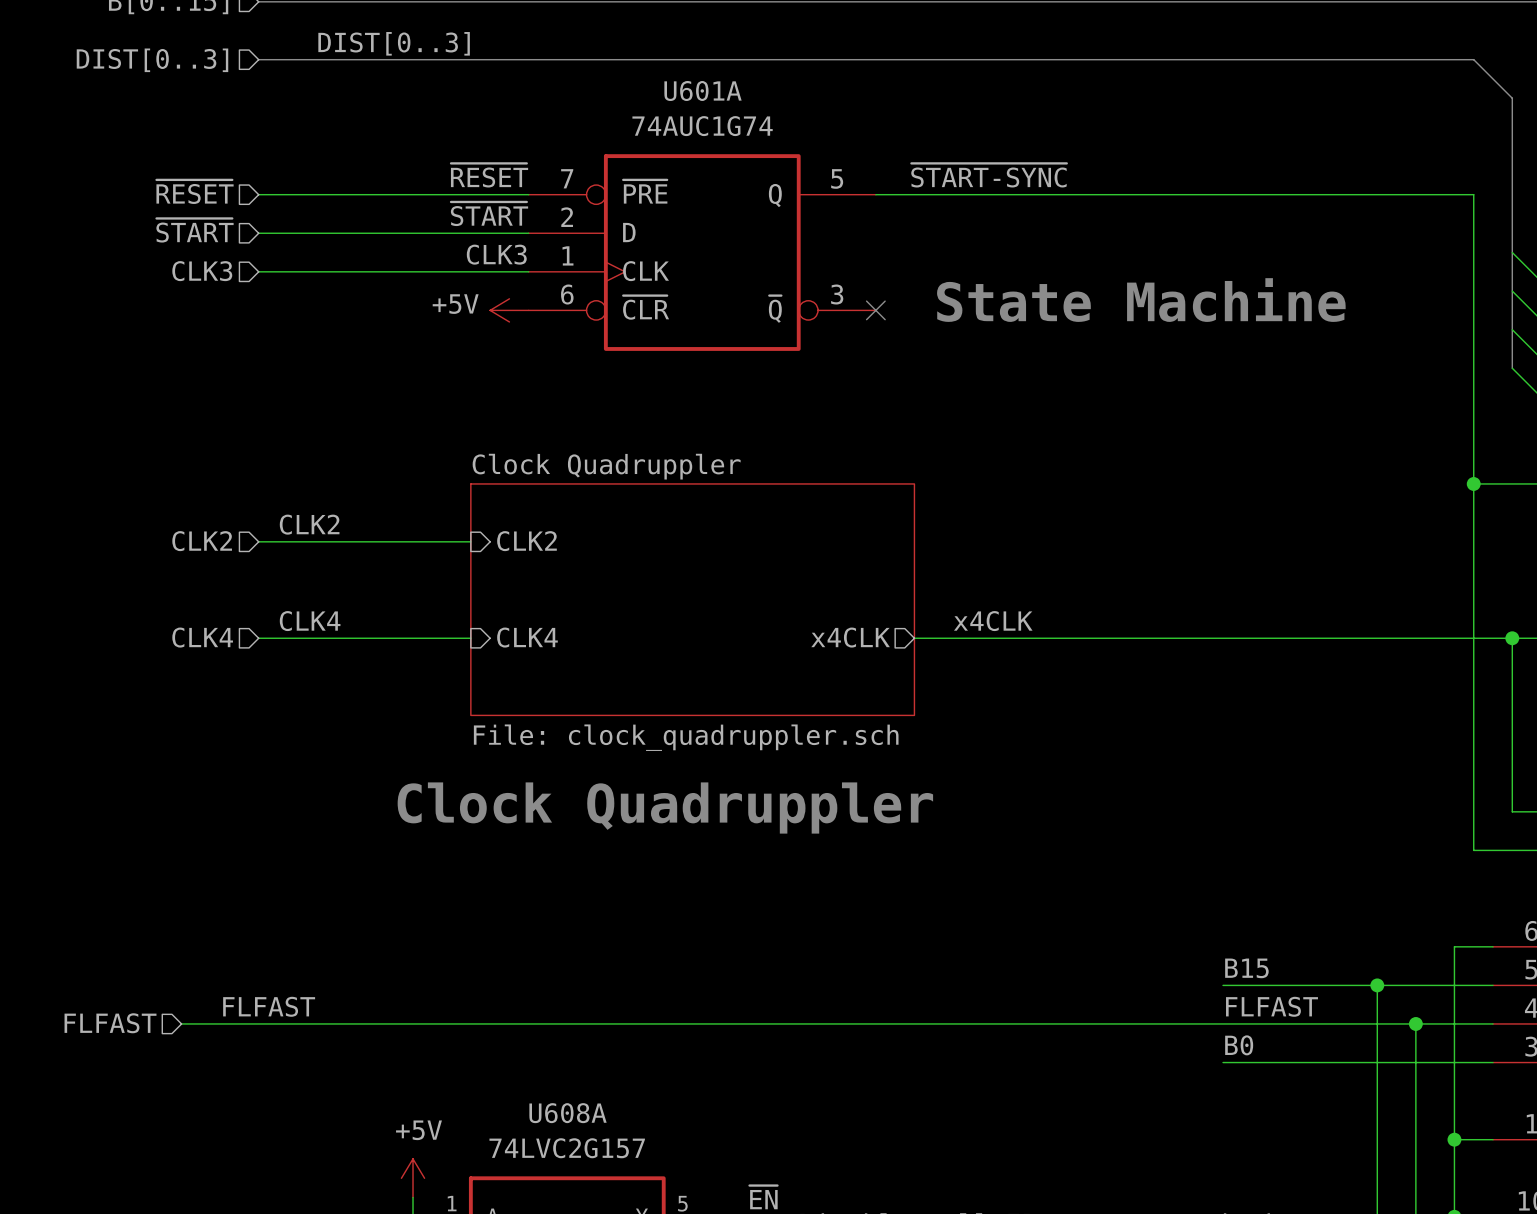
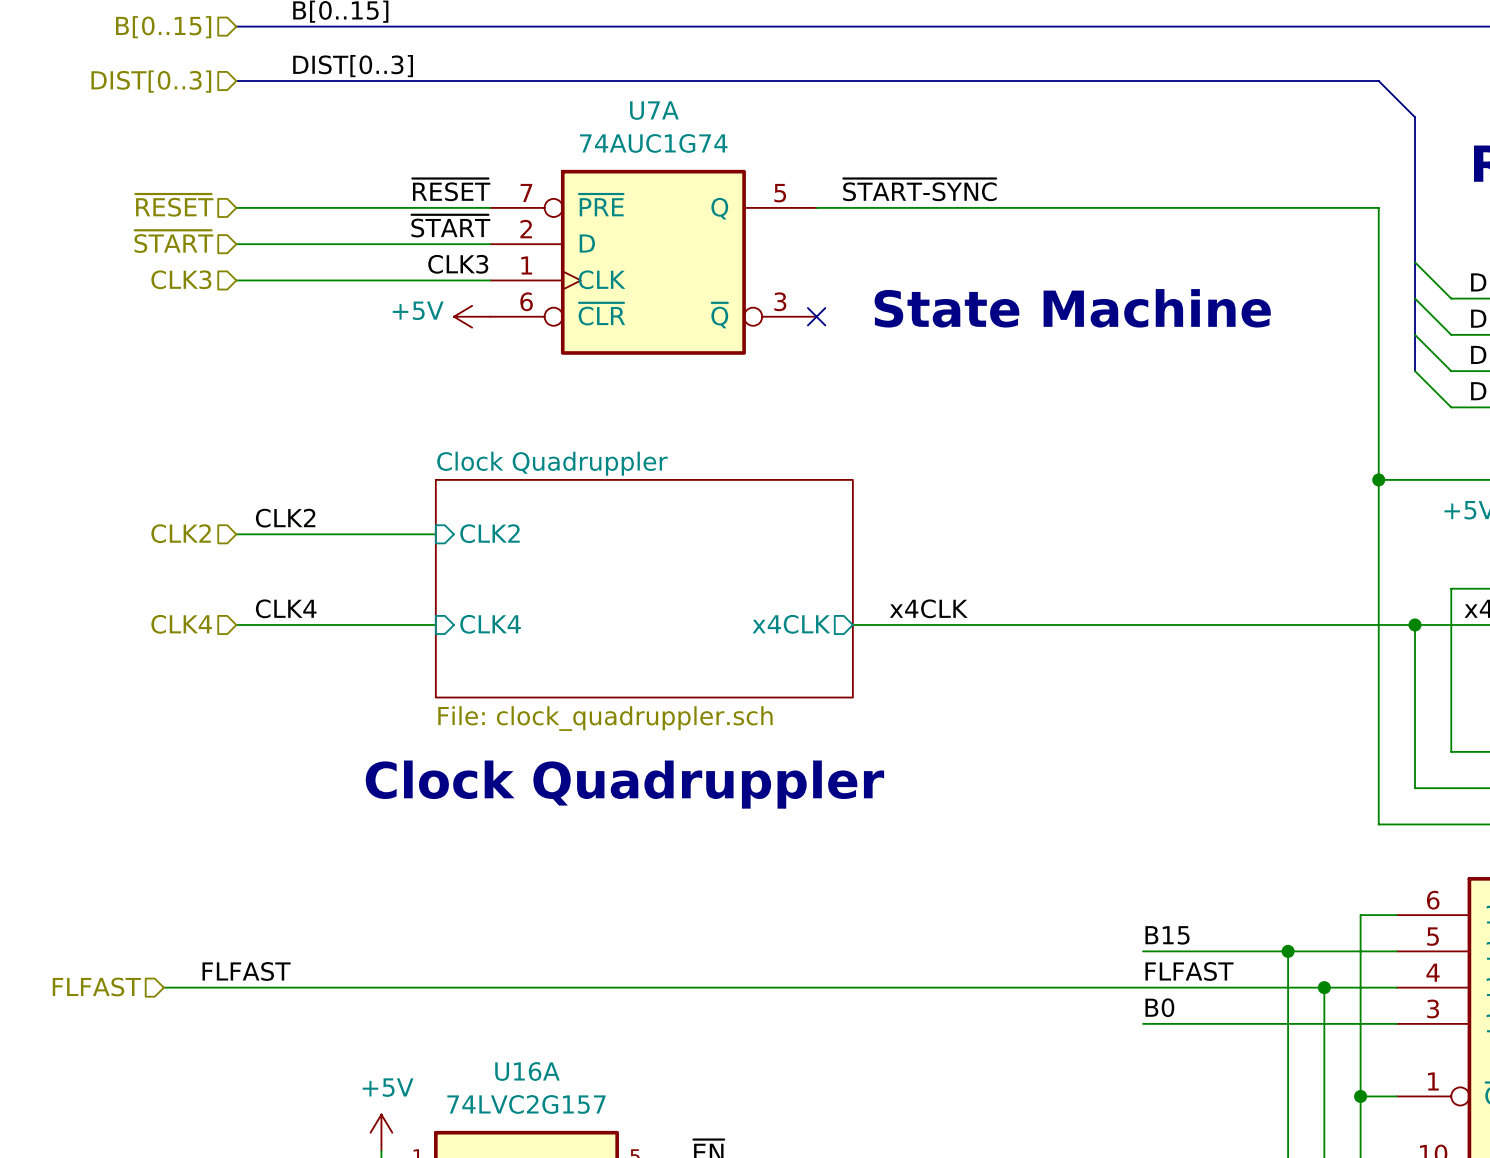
U601A name: U601A (703, 90) -> U7A (654, 110)
U608A name: U608A (568, 1113) -> U16A (527, 1071)

